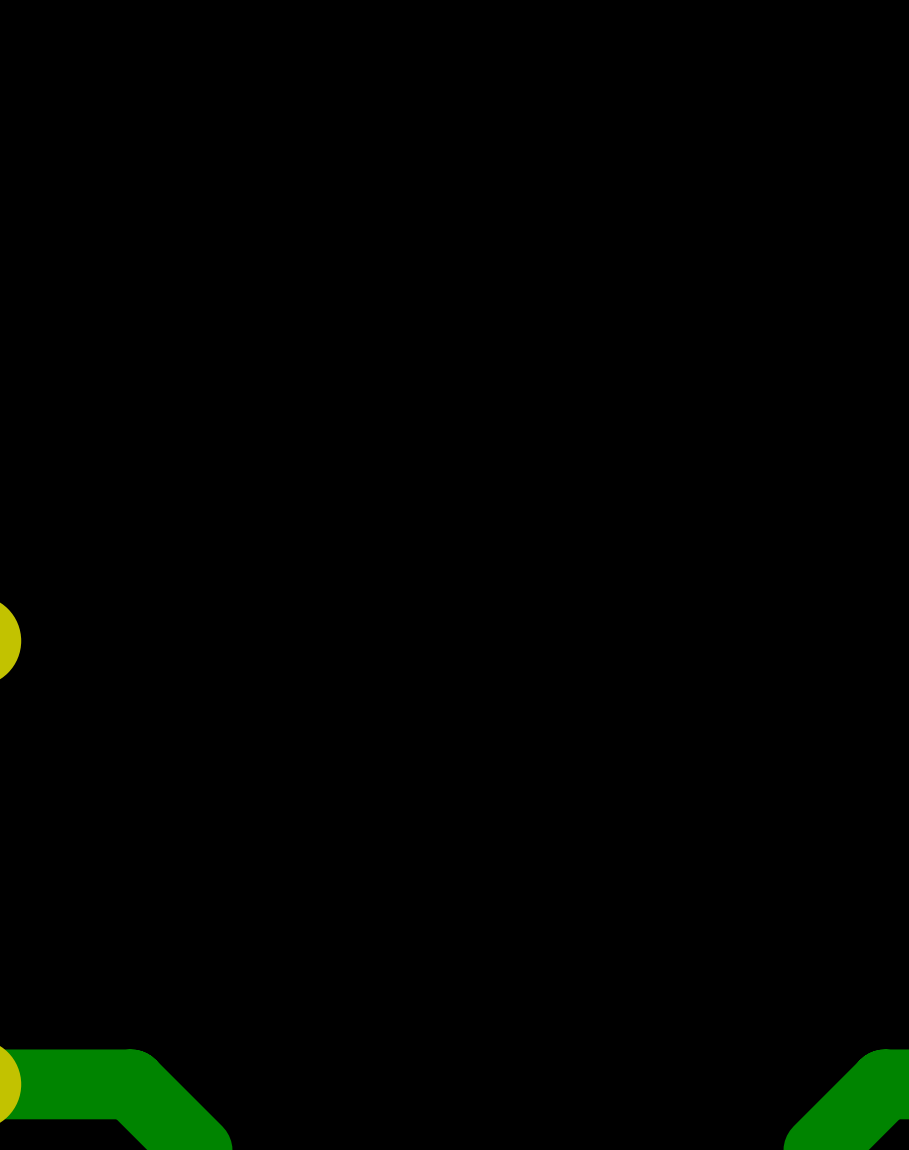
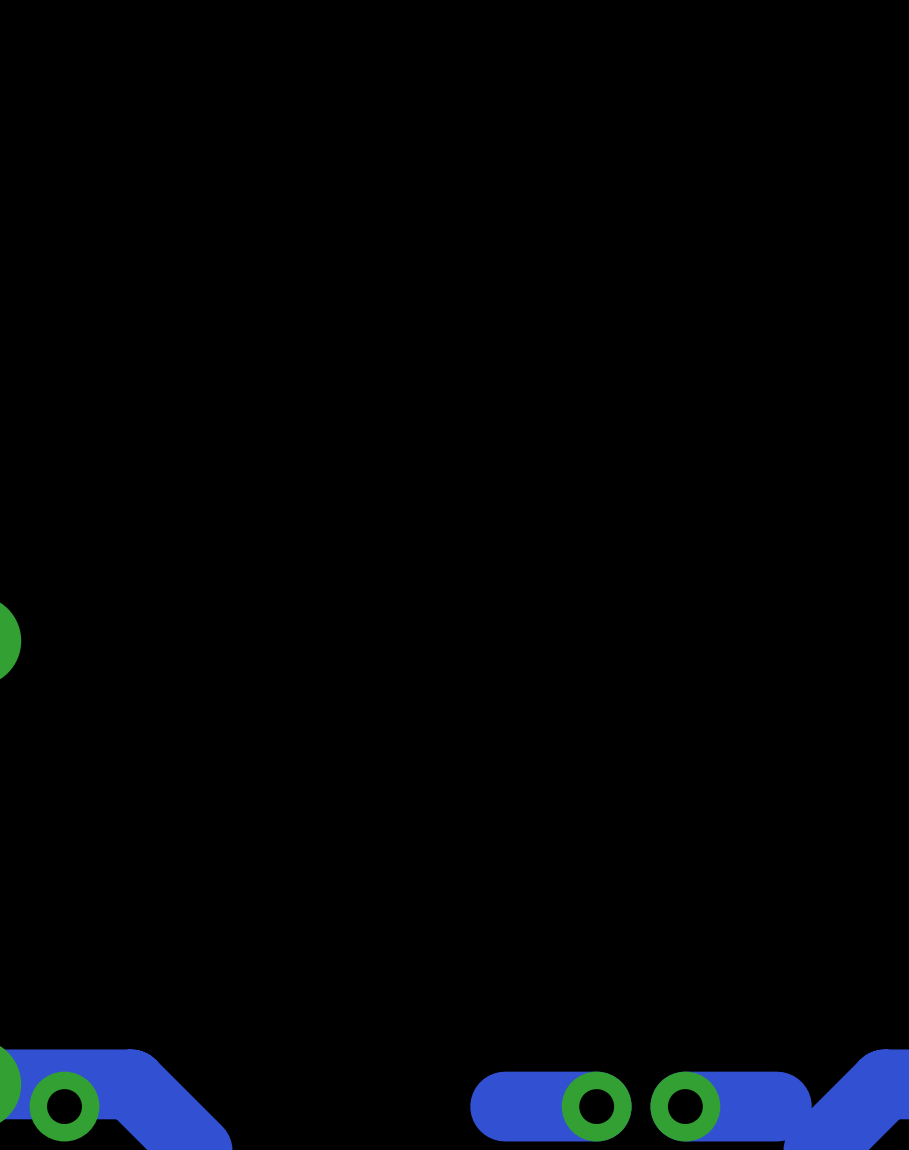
via: none -> (64, 1106)
bottom track: none -> (596, 1106) (505, 1106)
via: none -> (596, 1106)
via: none -> (685, 1106)
bottom track: none -> (776, 1106) (685, 1106)

